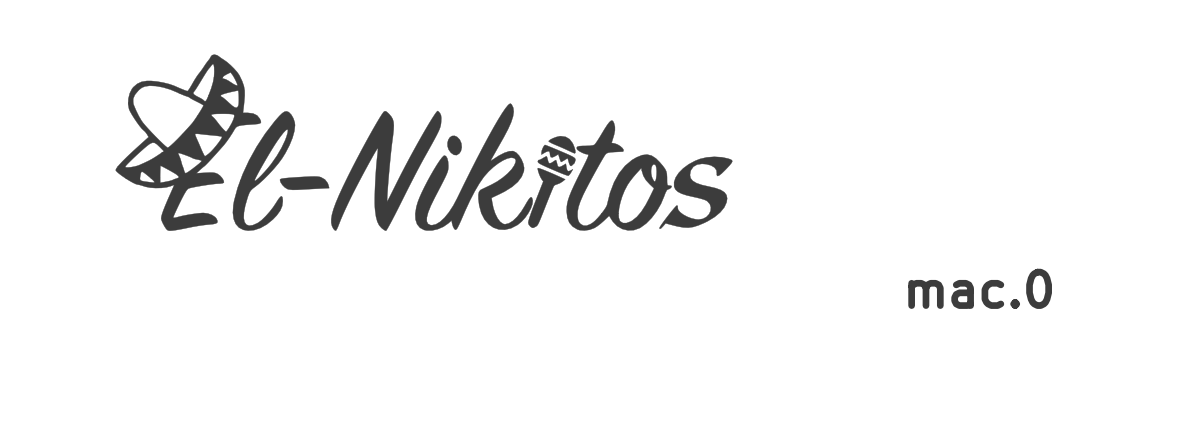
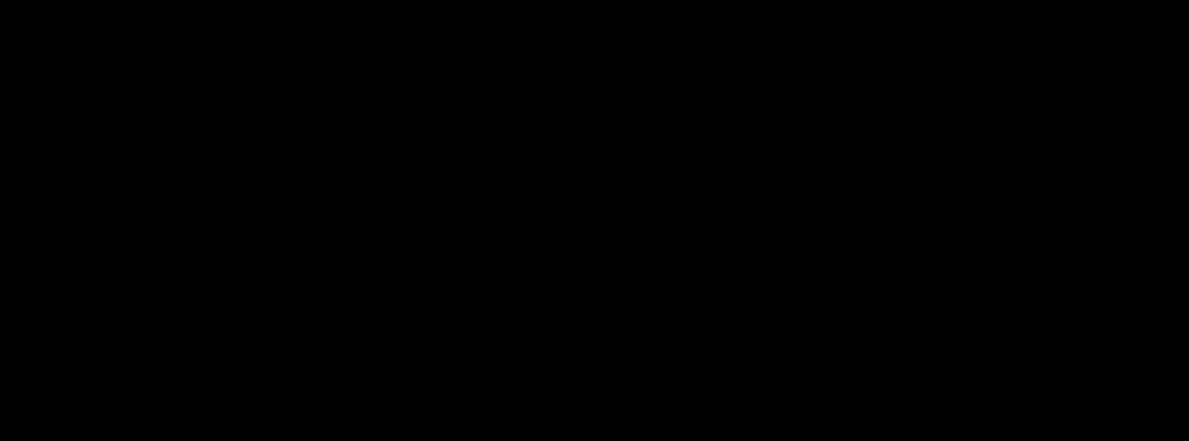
drawing: [115, 54, 733, 231] -> none
text: mac.0 (980, 288) -> none

